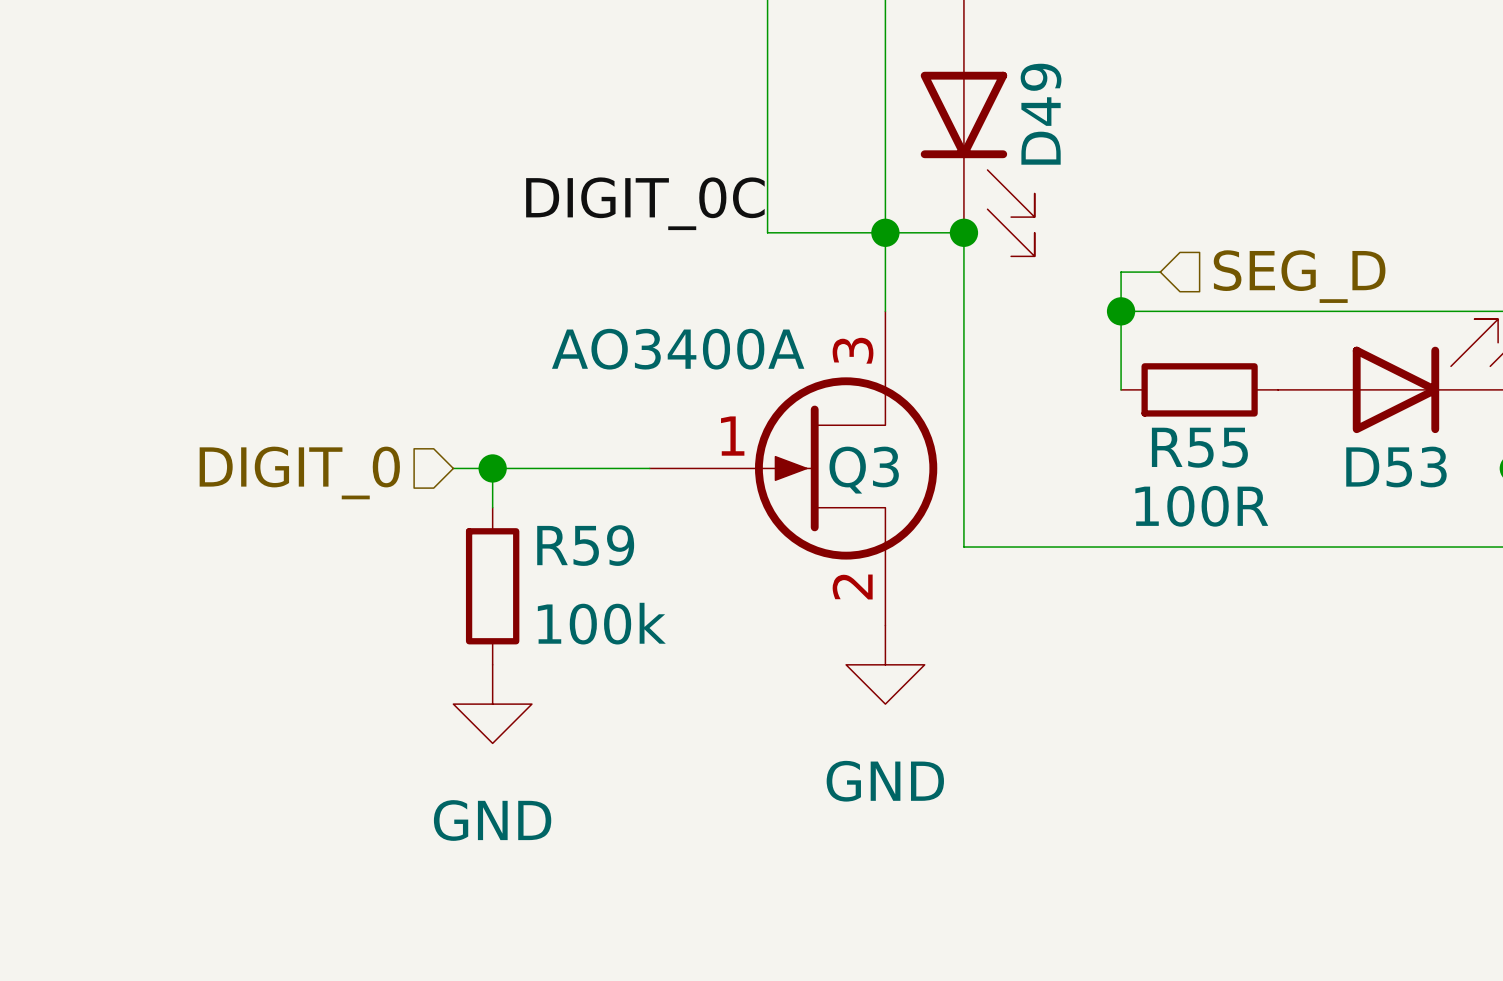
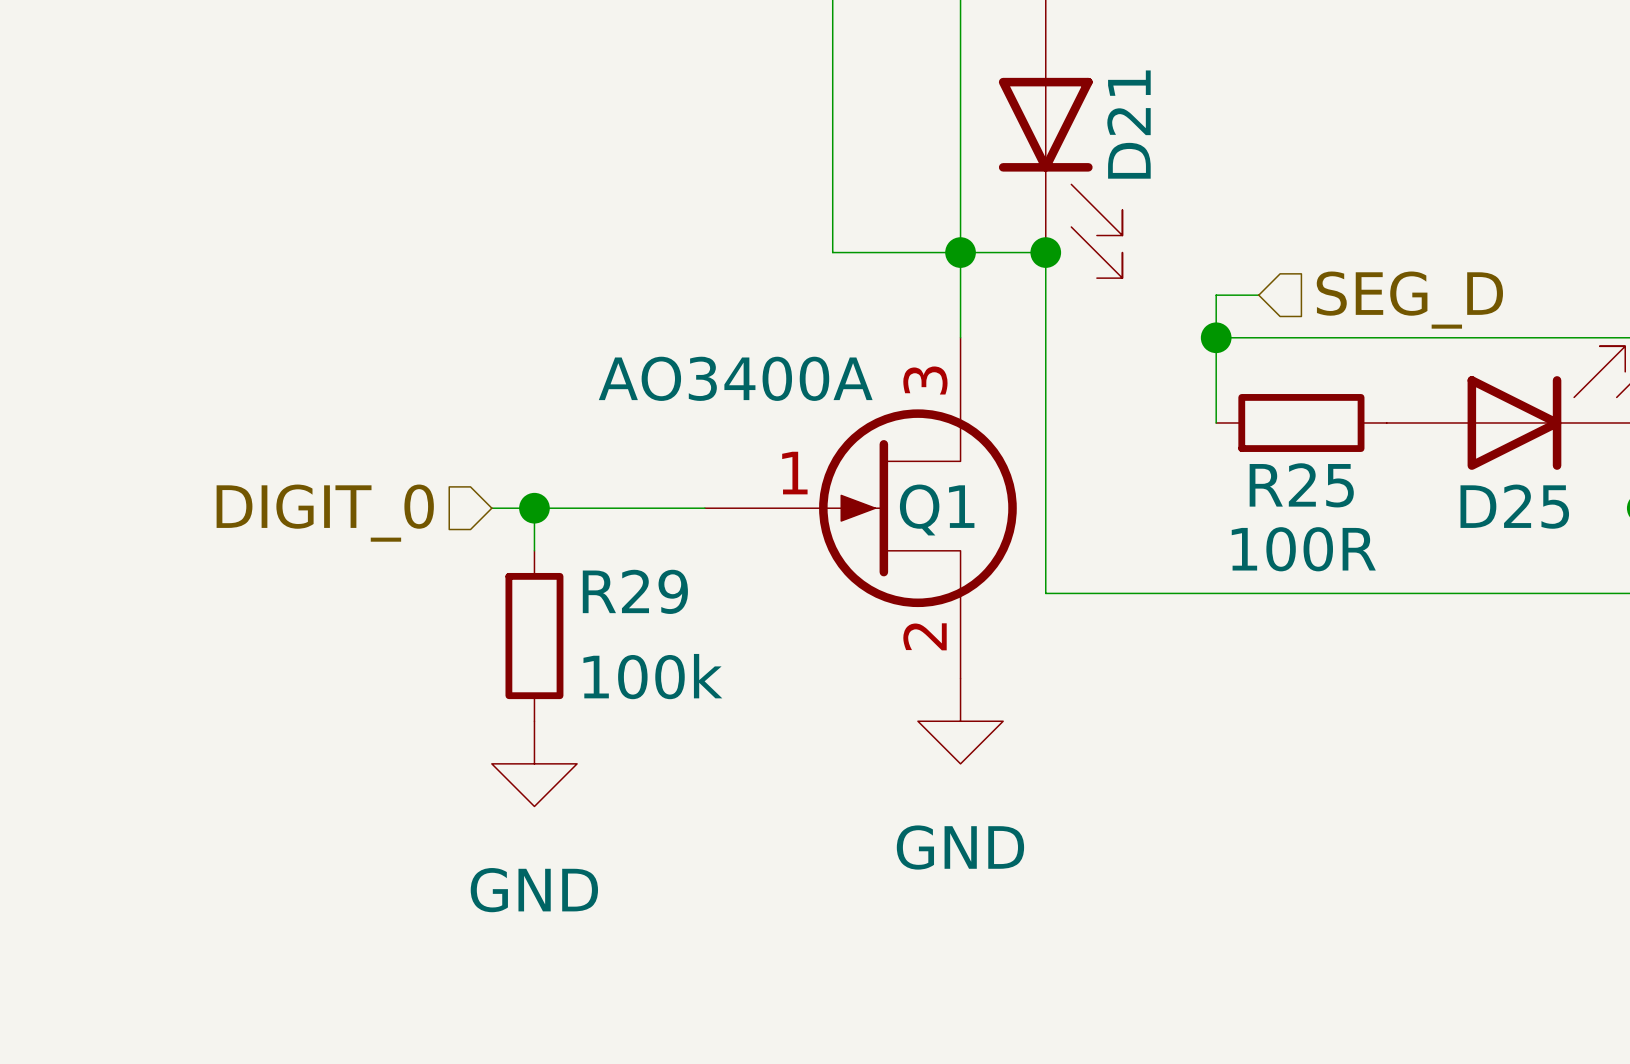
D49 name: D49 (1041, 114) -> D21 (1129, 124)
label: DIGIT_0C (645, 203) -> none
R55 name: R55 (1199, 447) -> R25 (1301, 485)
D53 name: D53 (1396, 467) -> D25 (1514, 506)
Q3 name: Q3 (864, 470) -> Q1 (937, 510)
R59 name: R59 (585, 545) -> R29 (635, 591)

